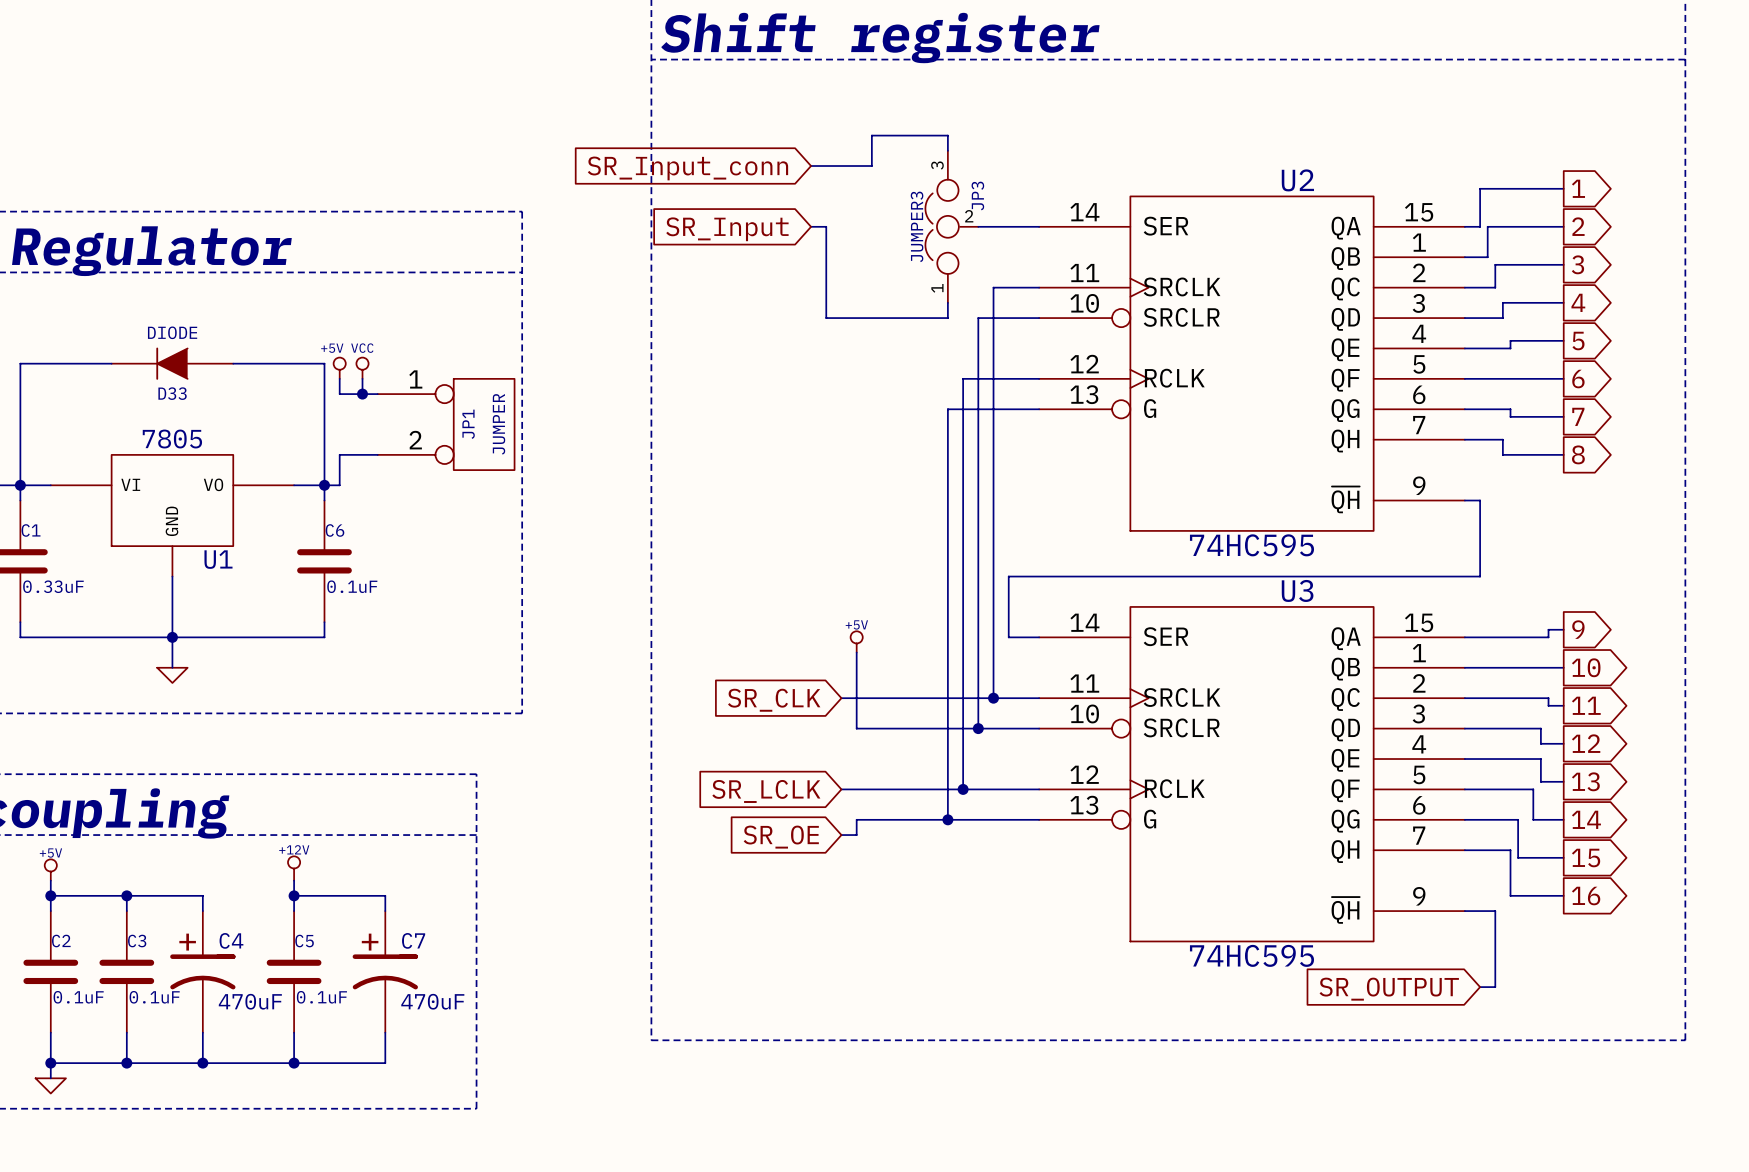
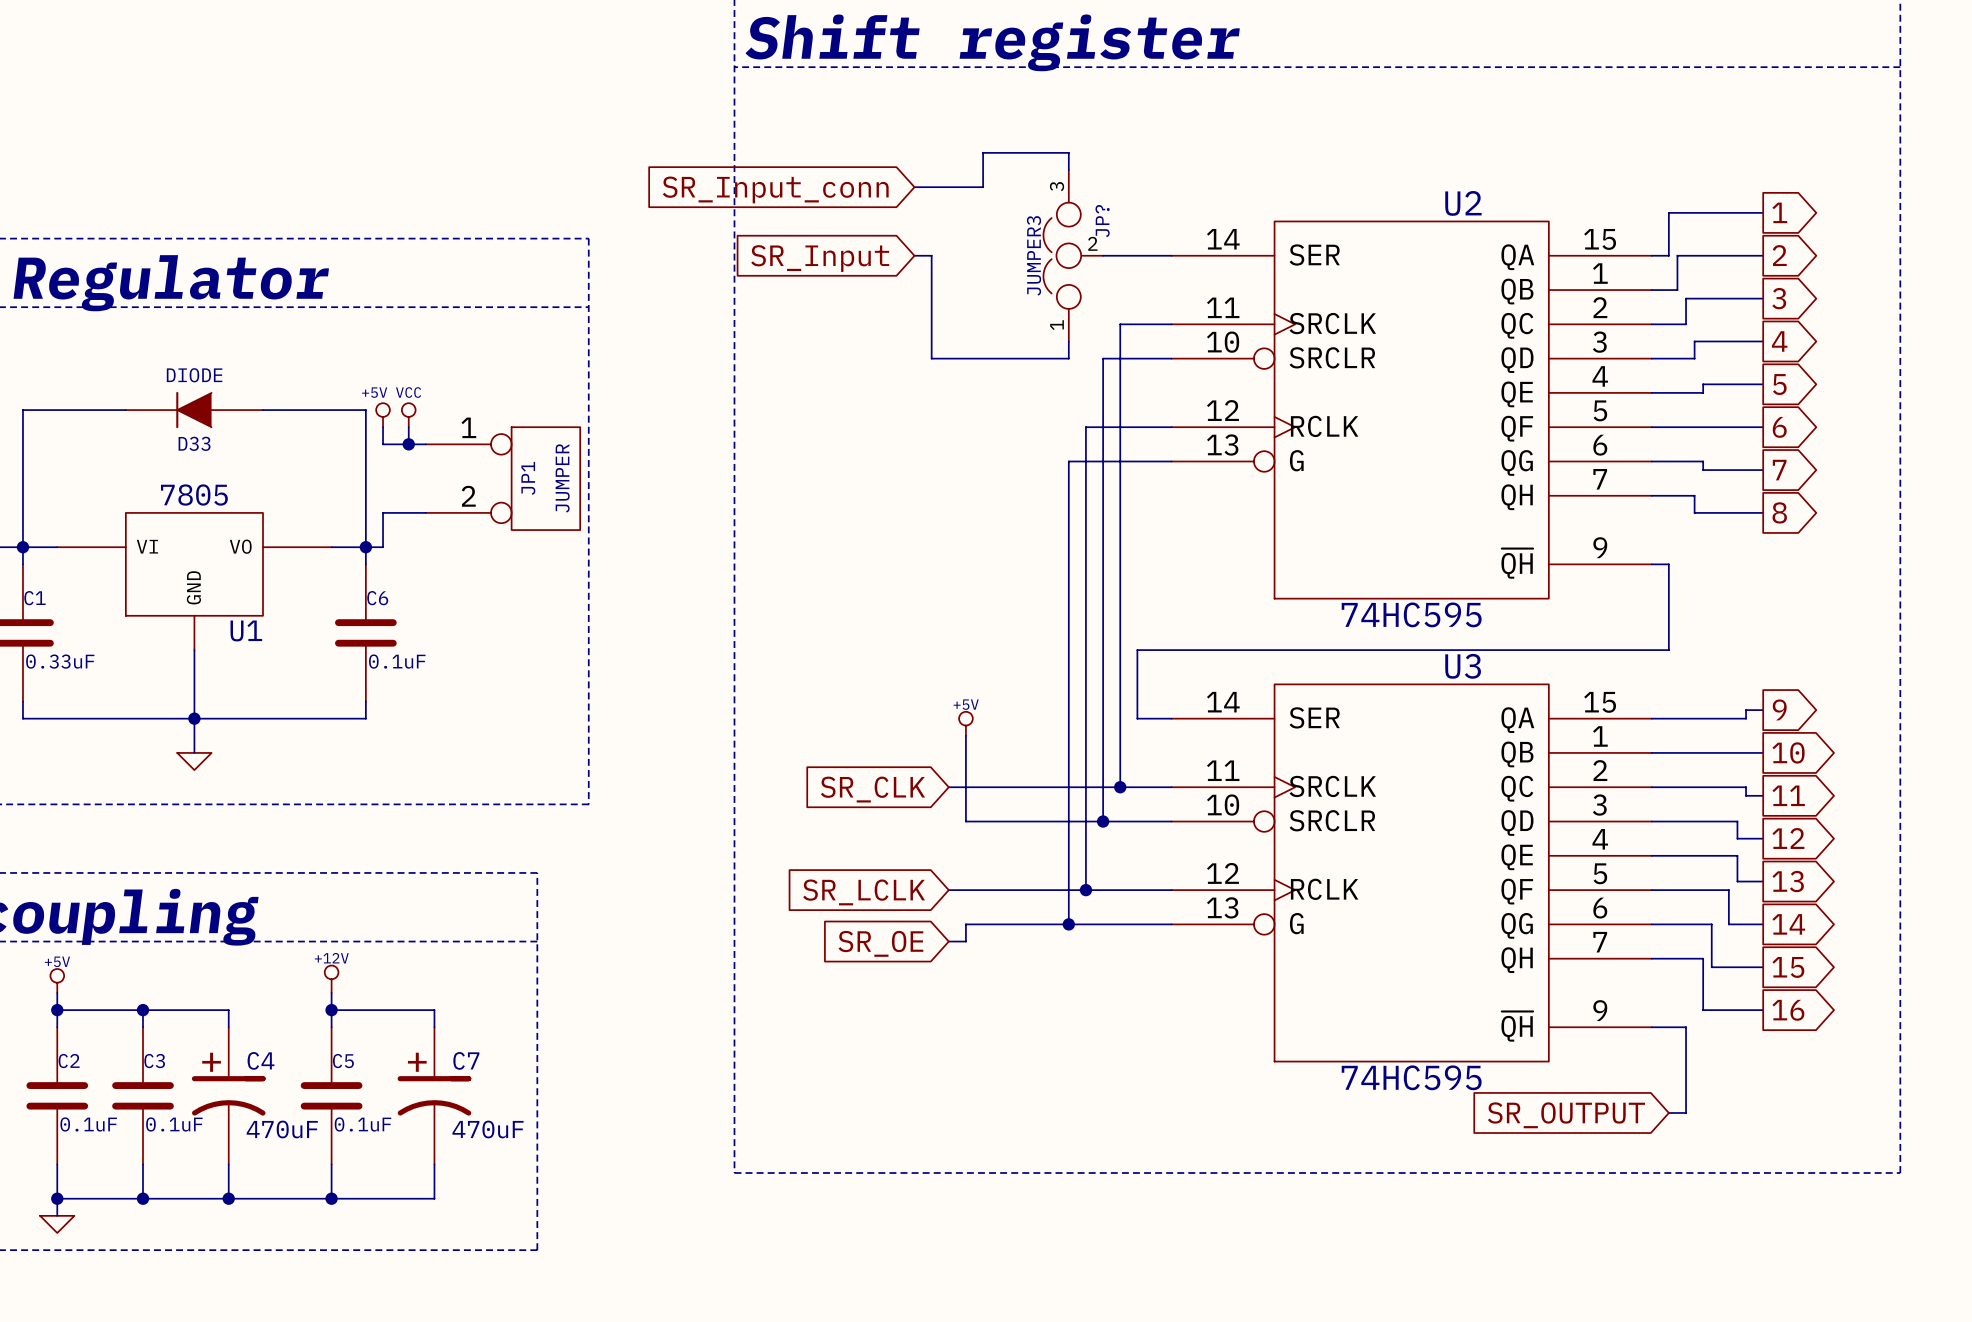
JP3 name: JP3 (977, 196) -> JP? (1102, 221)

